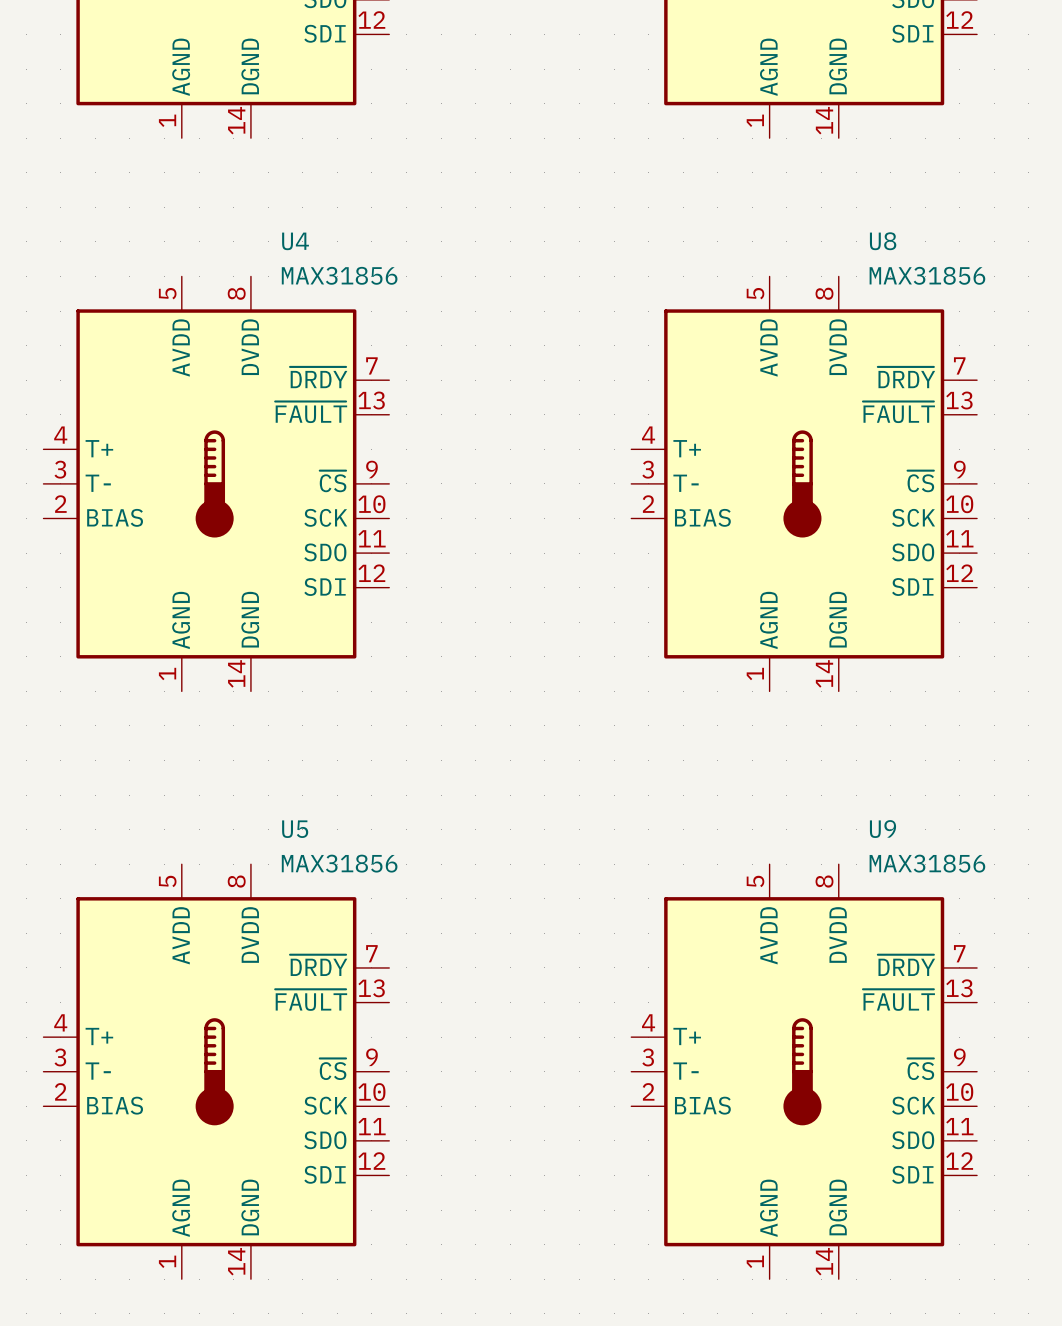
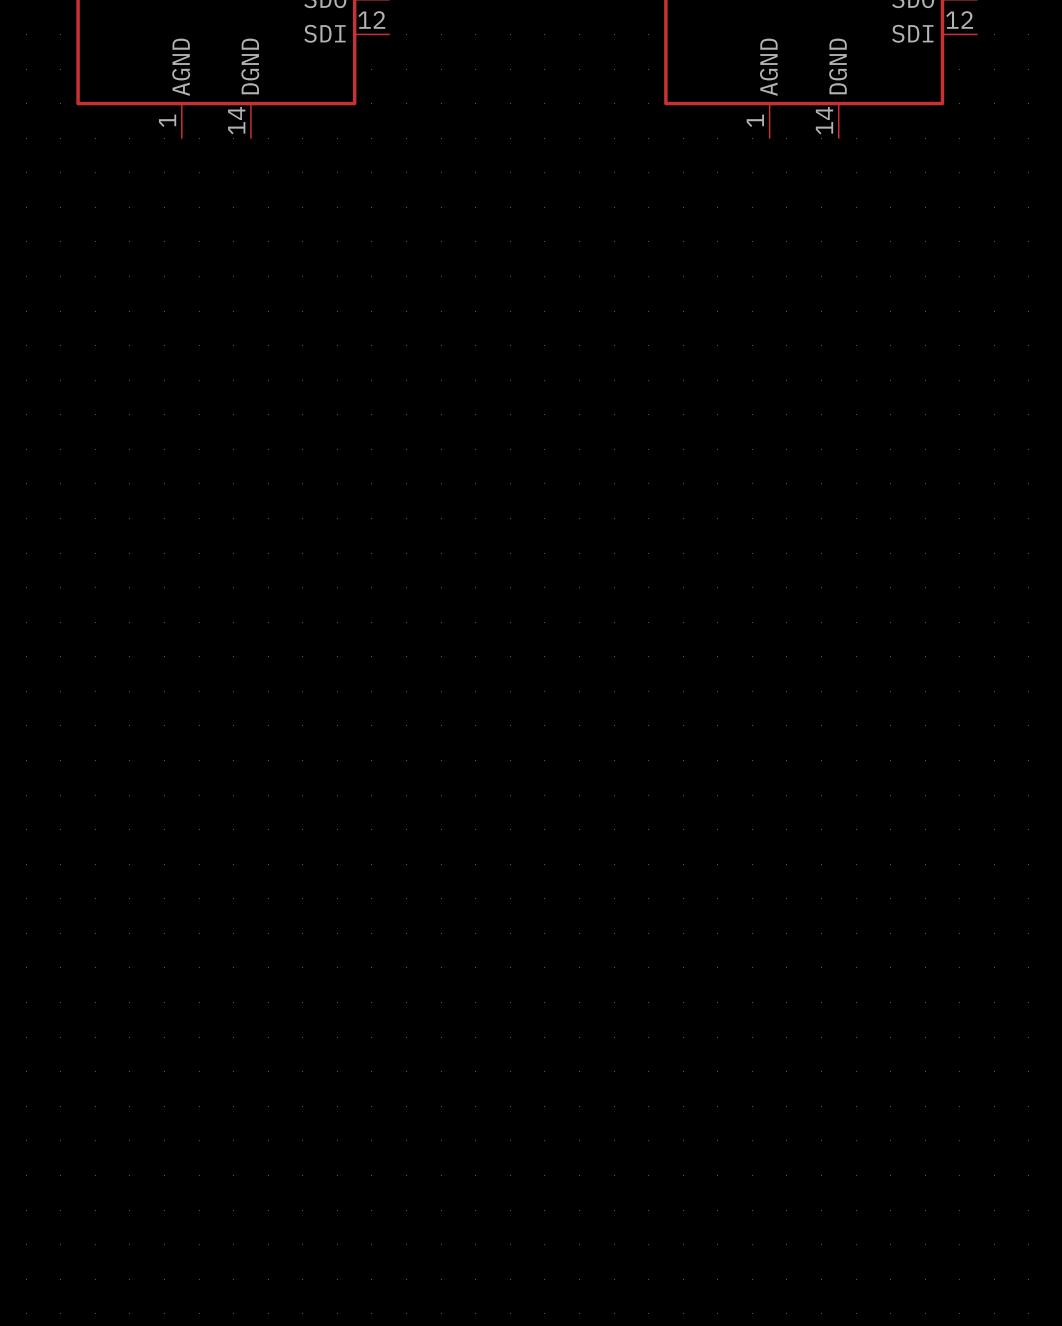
U4: MAX31856 (216, 483) -> none
U8: MAX31856 (804, 483) -> none
U5: MAX31856 (216, 1071) -> none
U9: MAX31856 (804, 1071) -> none

